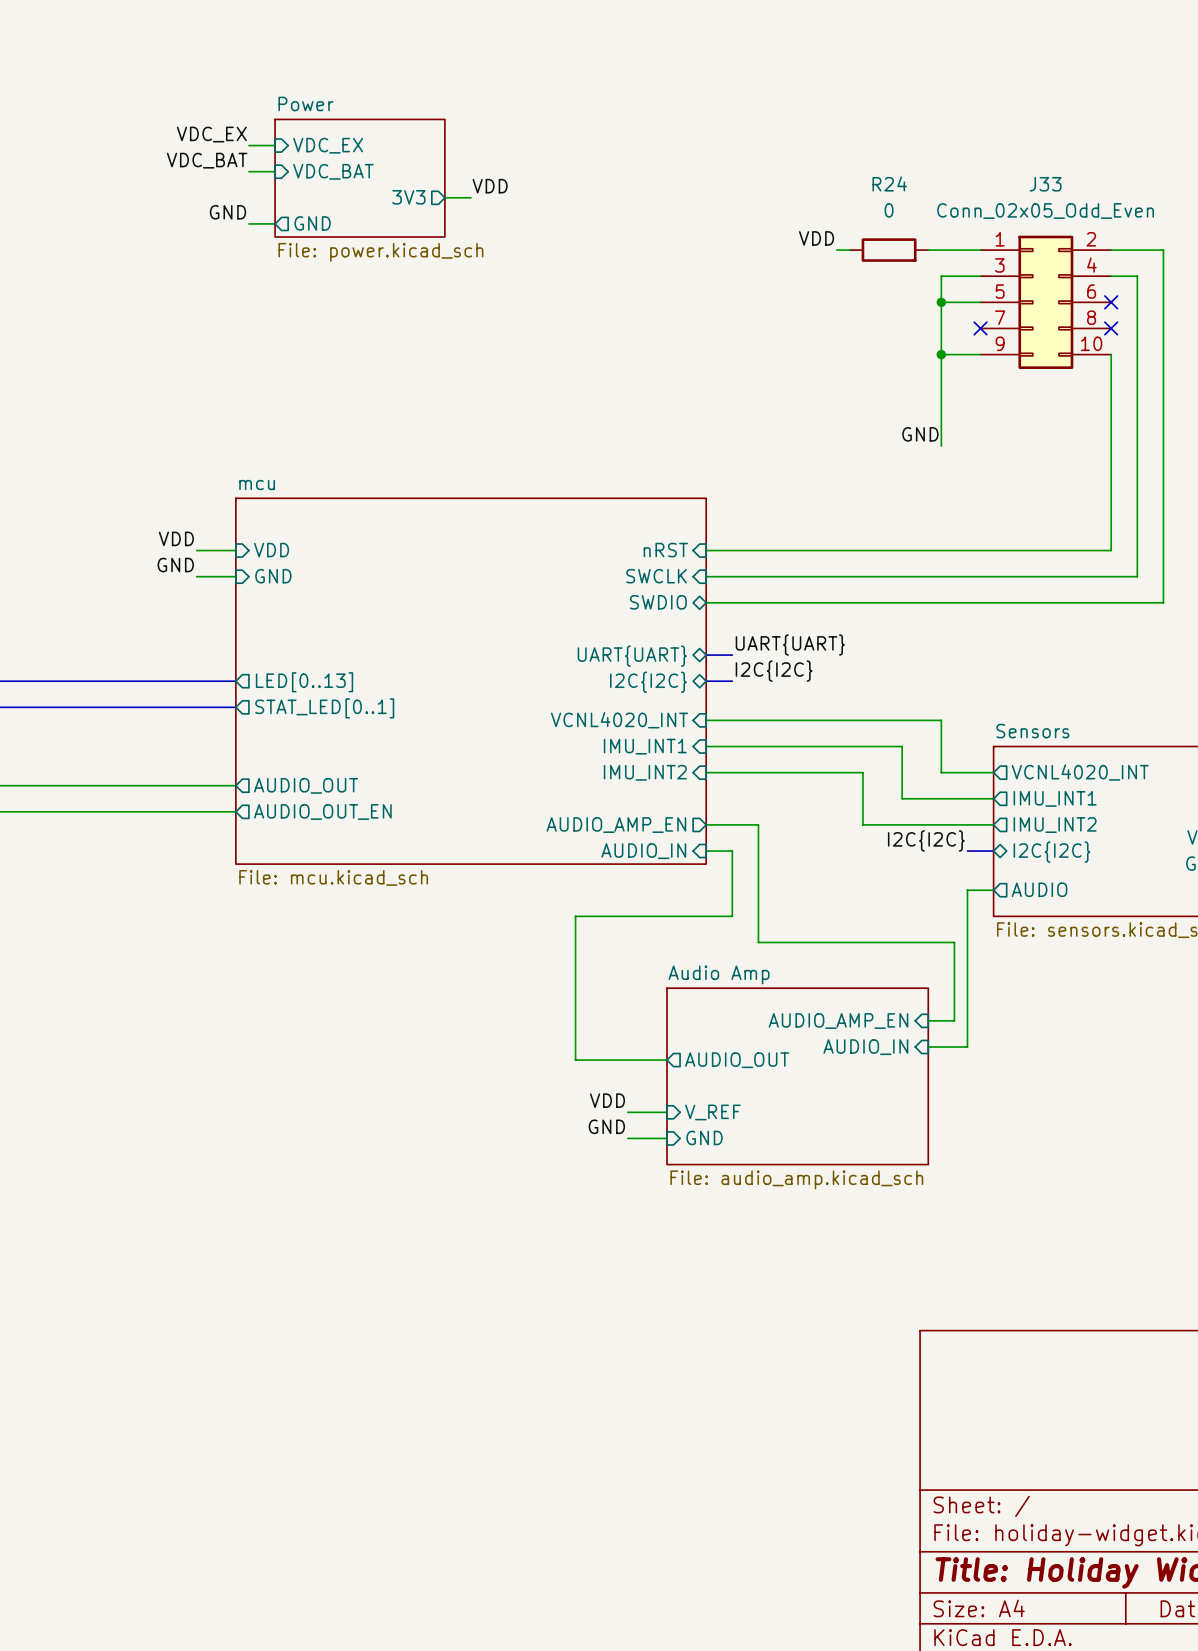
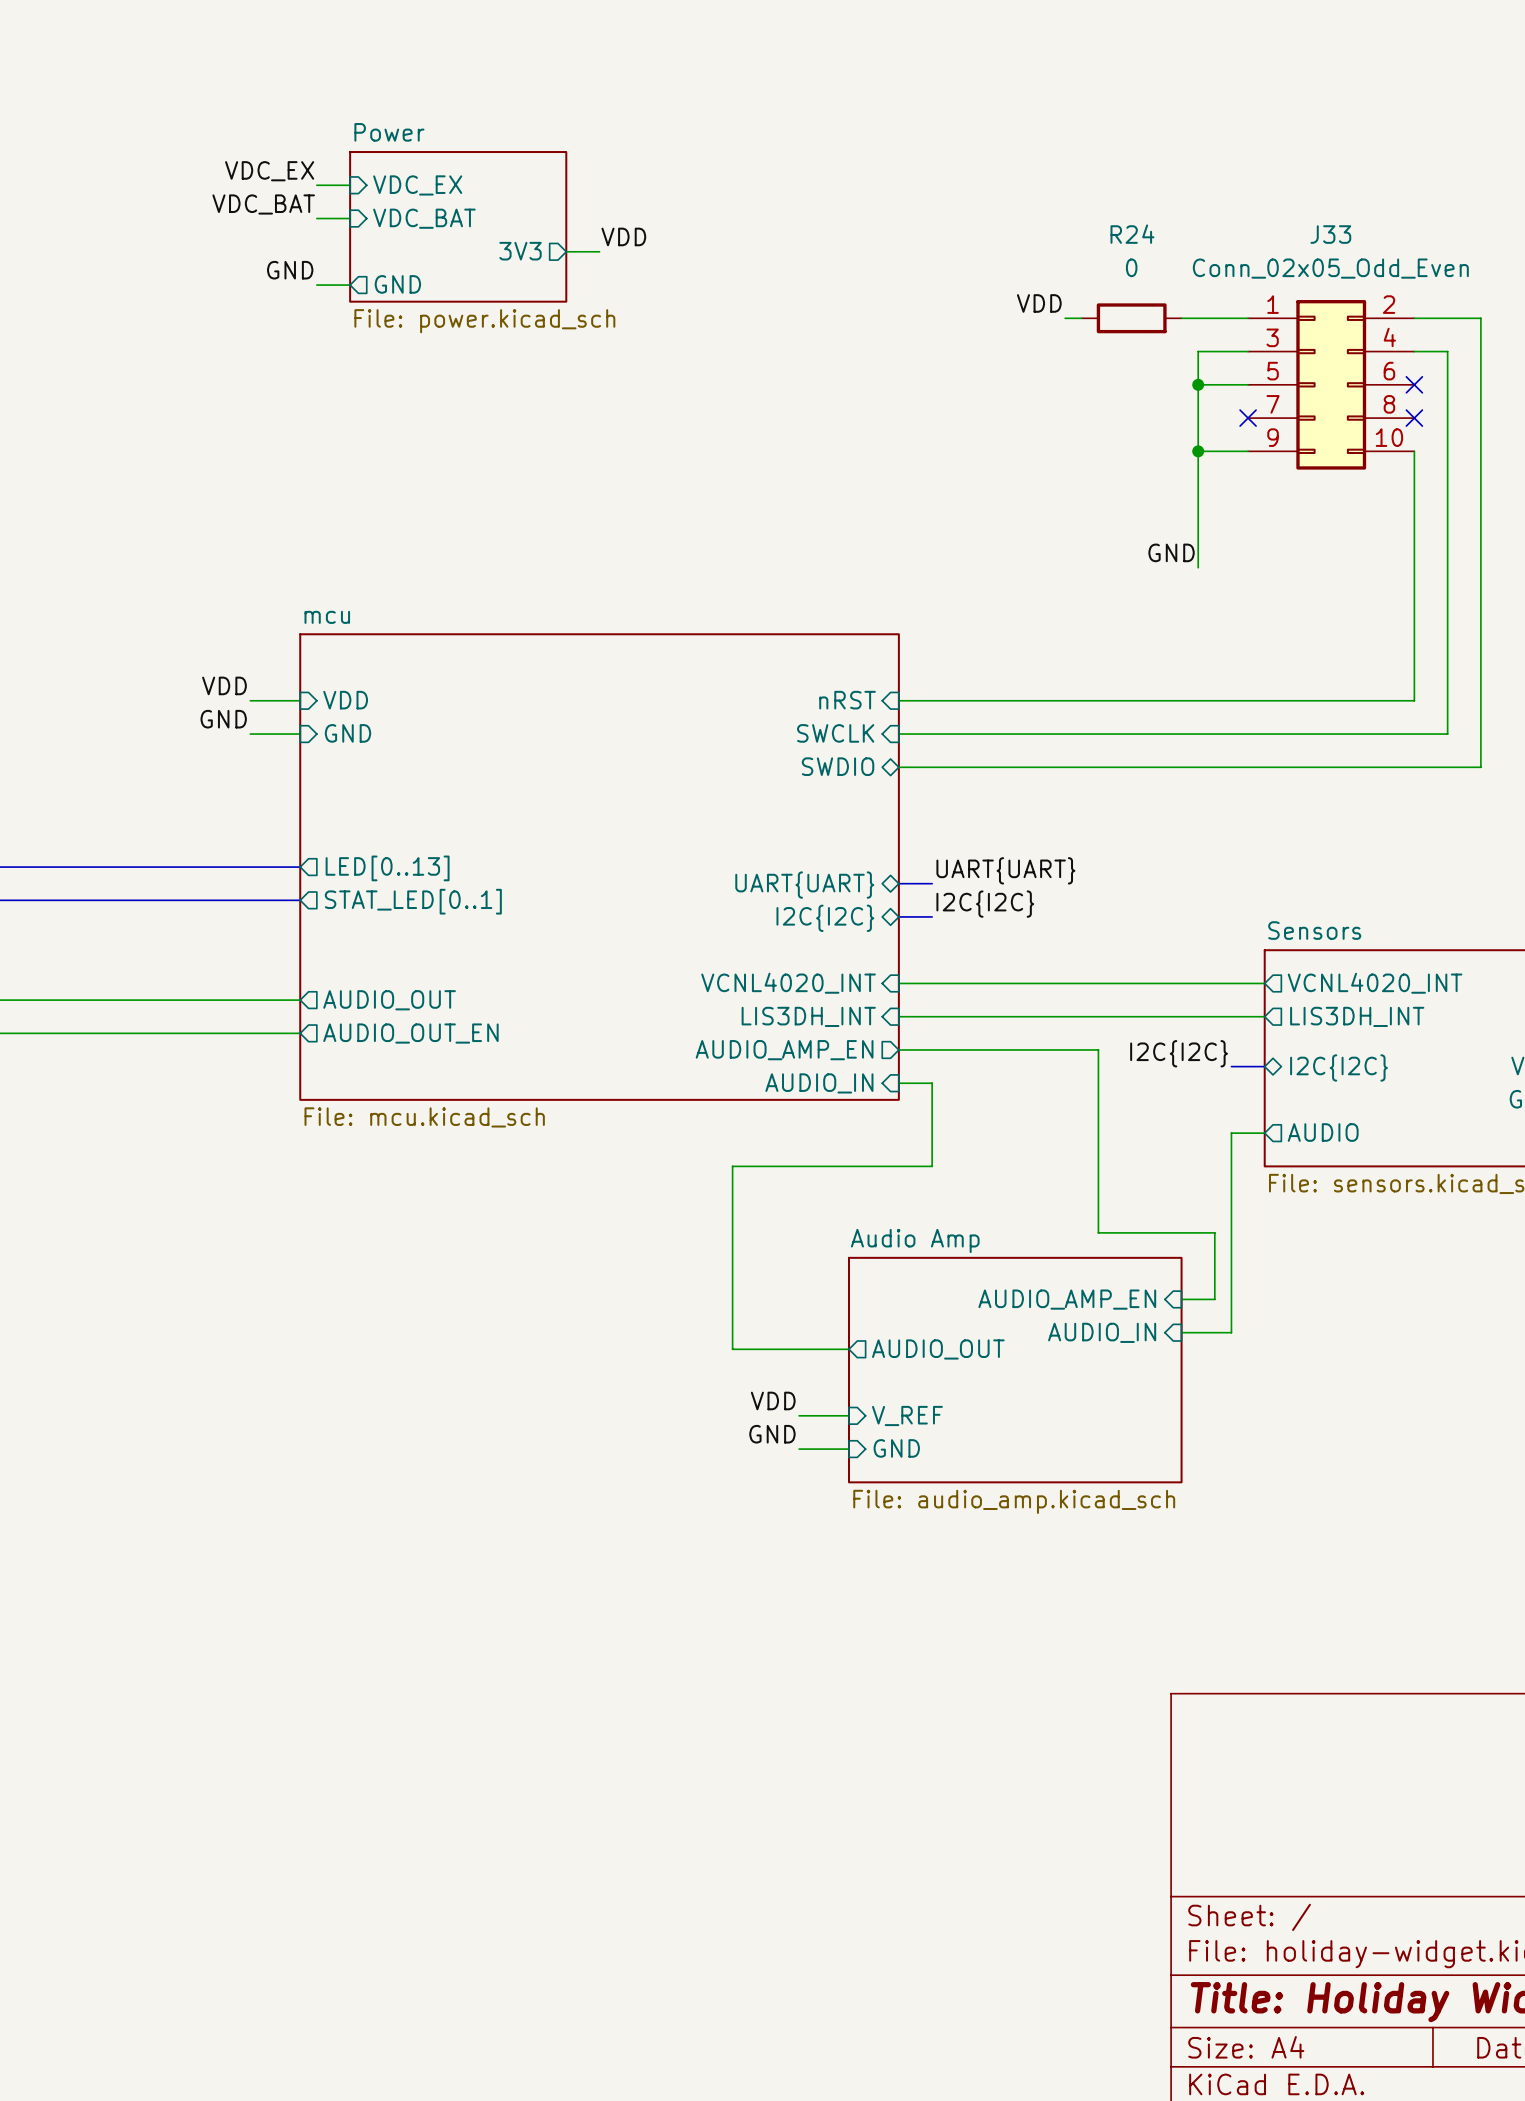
label position: UART{UART} (790, 644) -> UART{UART} (1005, 870)
bus: (706, 655) (732, 655) -> (898, 883) (932, 883)
sheet pin position: UART{UART} (632, 656) -> UART{UART} (804, 885)
label position: I2C{I2C} (774, 671) -> I2C{I2C} (985, 904)
bus: (706, 681) (732, 681) -> (898, 916) (932, 916)
sheet pin: I2C{I2C} (648, 682) -> none
sheet pin shape: input (619, 720) -> bidirectional (825, 918)
sheet pin: VCNL4020_INT (619, 720) -> I2C{I2C} (825, 918)
wire: (706, 720) (941, 720) (941, 772) -> none
sheet pin: IMU_INT1 (645, 746) -> none
wire: (706, 746) (902, 746) (902, 798) -> (898, 1016) (1148, 1016)
sheet pin: IMU_INT2 (645, 772) -> VCNL4020_INT (788, 983)
wire: (862, 772) (862, 824) (993, 824) -> (1098, 983) (1198, 983)
sheet pin: none -> LIS3DH_INT (808, 1016)
sheet pin: IMU_INT1 (1055, 798) -> LIS3DH_INT (1357, 1016)
wire: (758, 824) (758, 942) (954, 942) (954, 968) -> (965, 1049) (1098, 1049) (1098, 1232) (1214, 1232)
sheet pin: IMU_INT2 (1055, 825) -> none
label position: I2C{I2C} (926, 840) -> I2C{I2C} (1179, 1053)
bus: (967, 851) (993, 851) -> (1231, 1066) (1264, 1066)
sheet pin position: I2C{I2C} (1051, 852) -> I2C{I2C} (1339, 1067)

